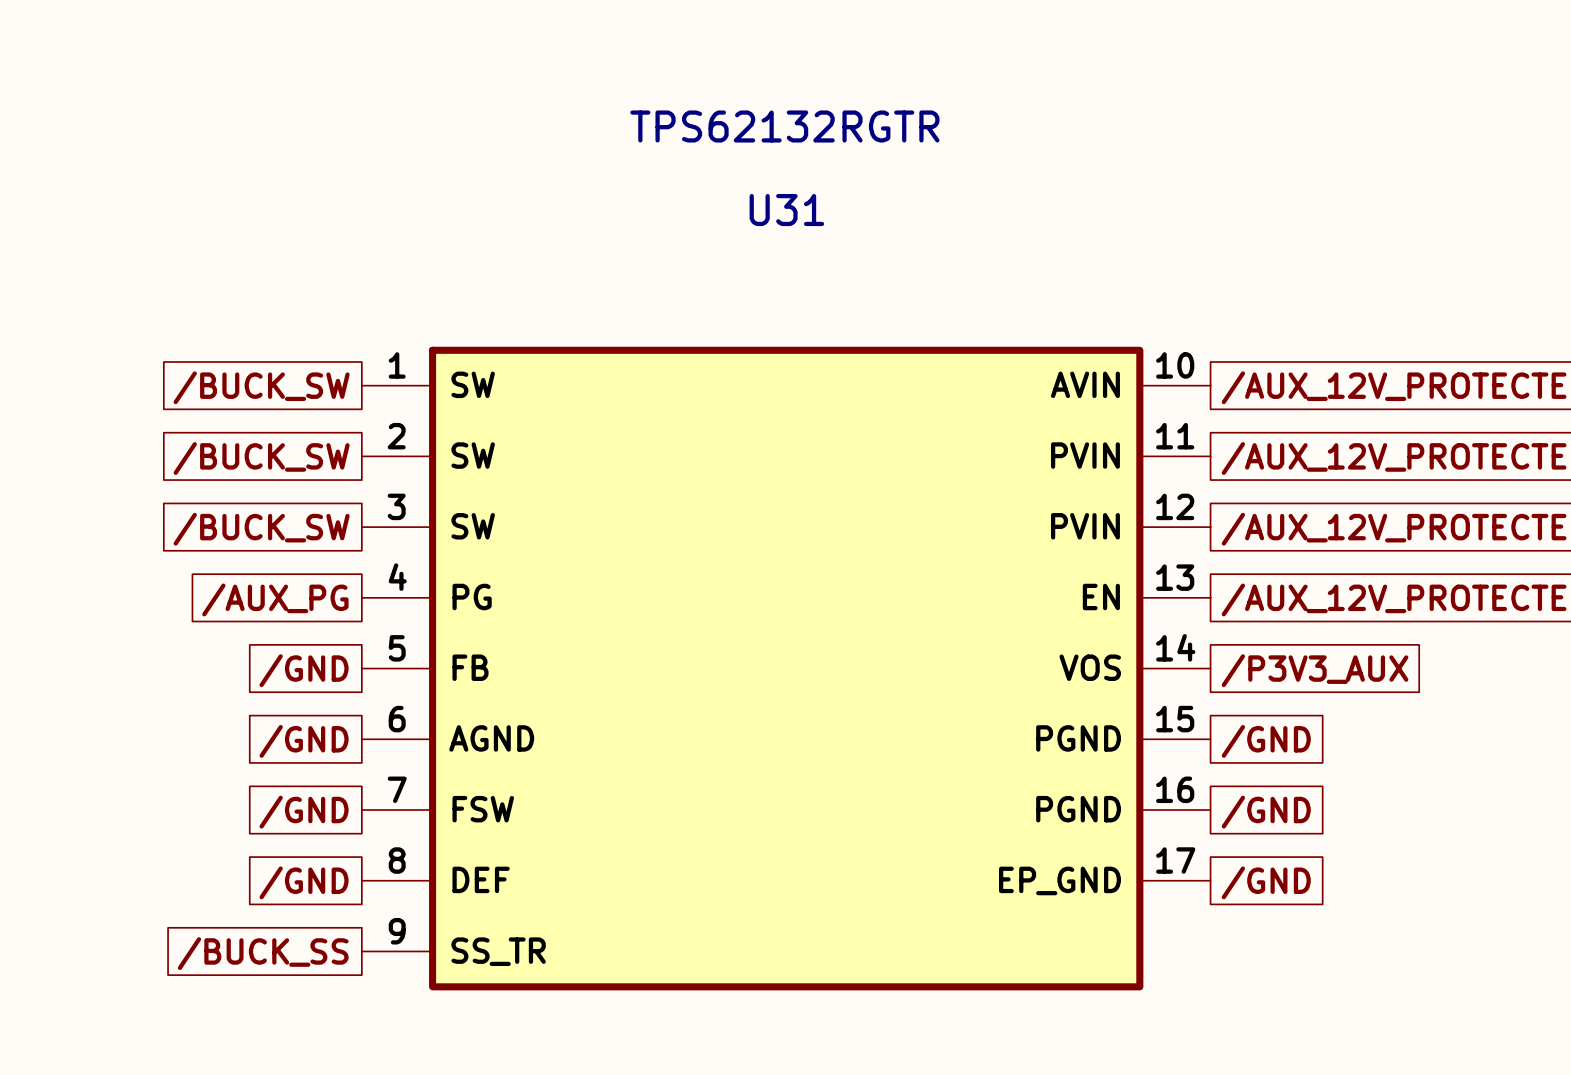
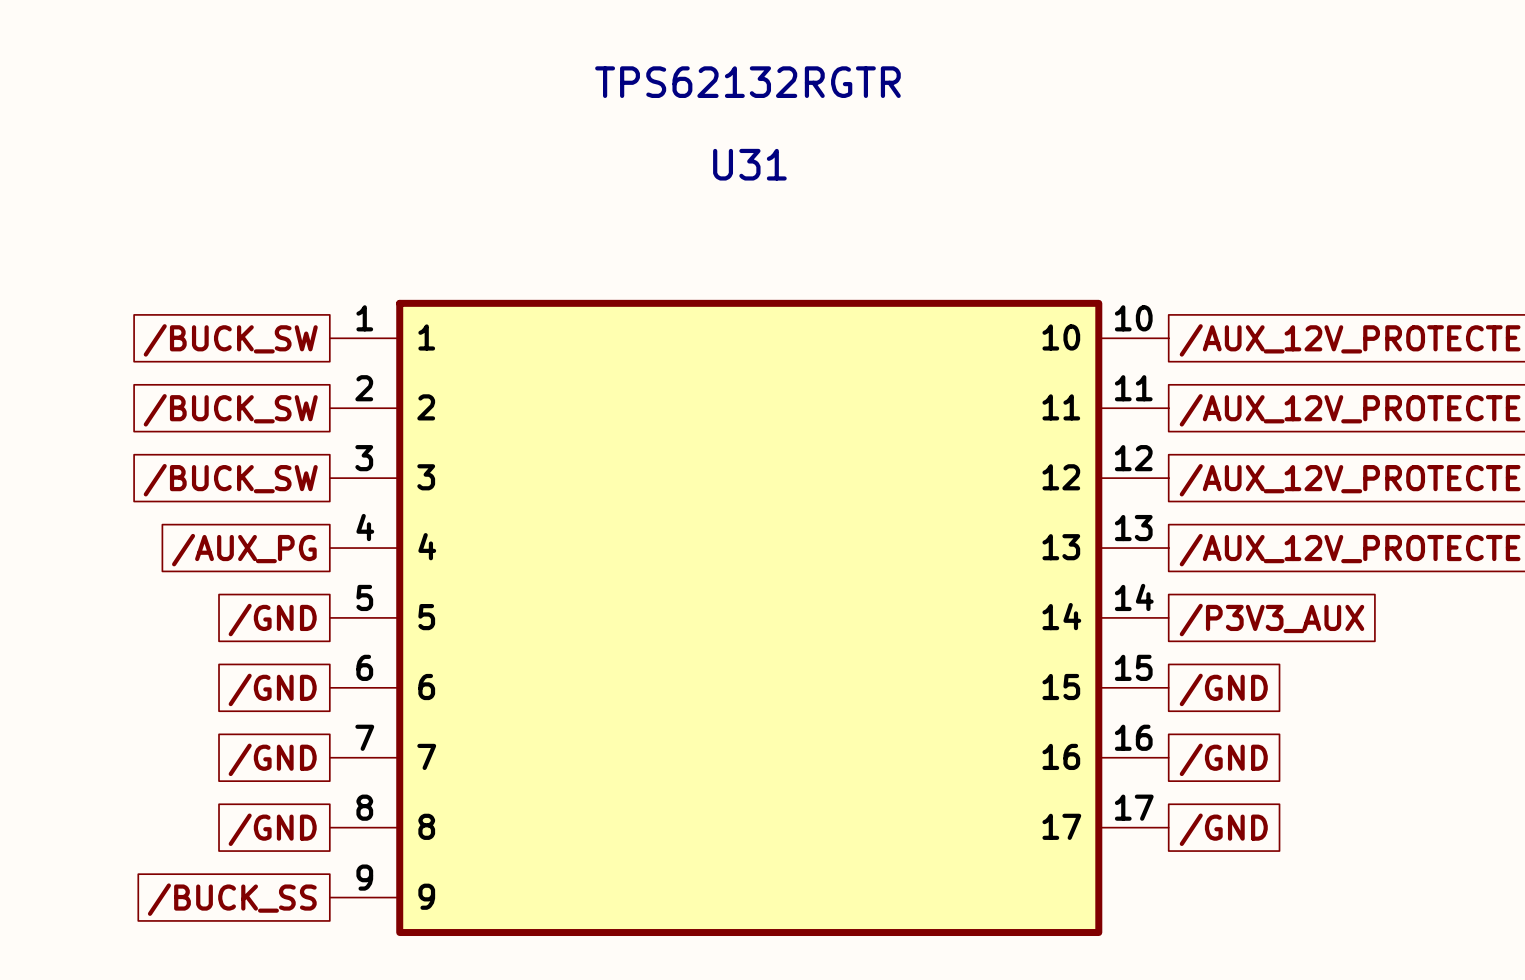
U31 symbol: [361, 346, 1211, 991] -> [329, 299, 1169, 937]

